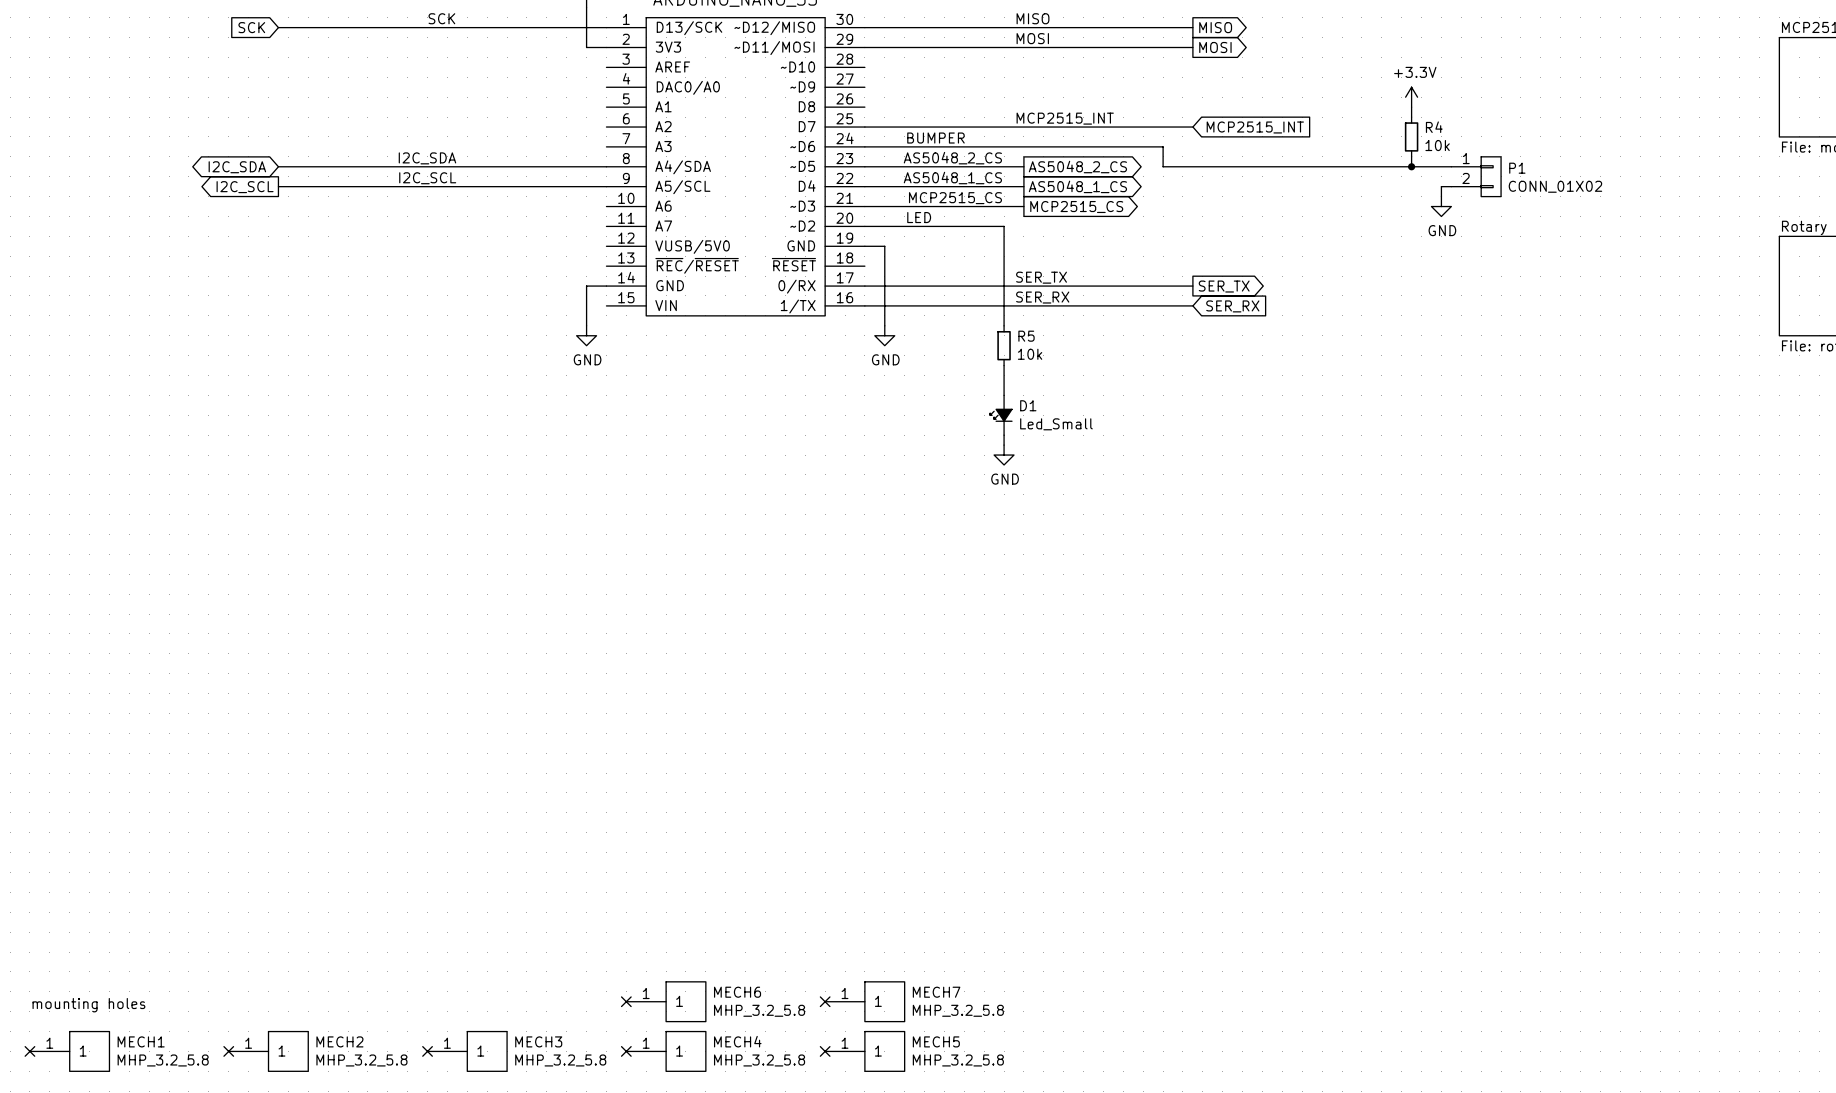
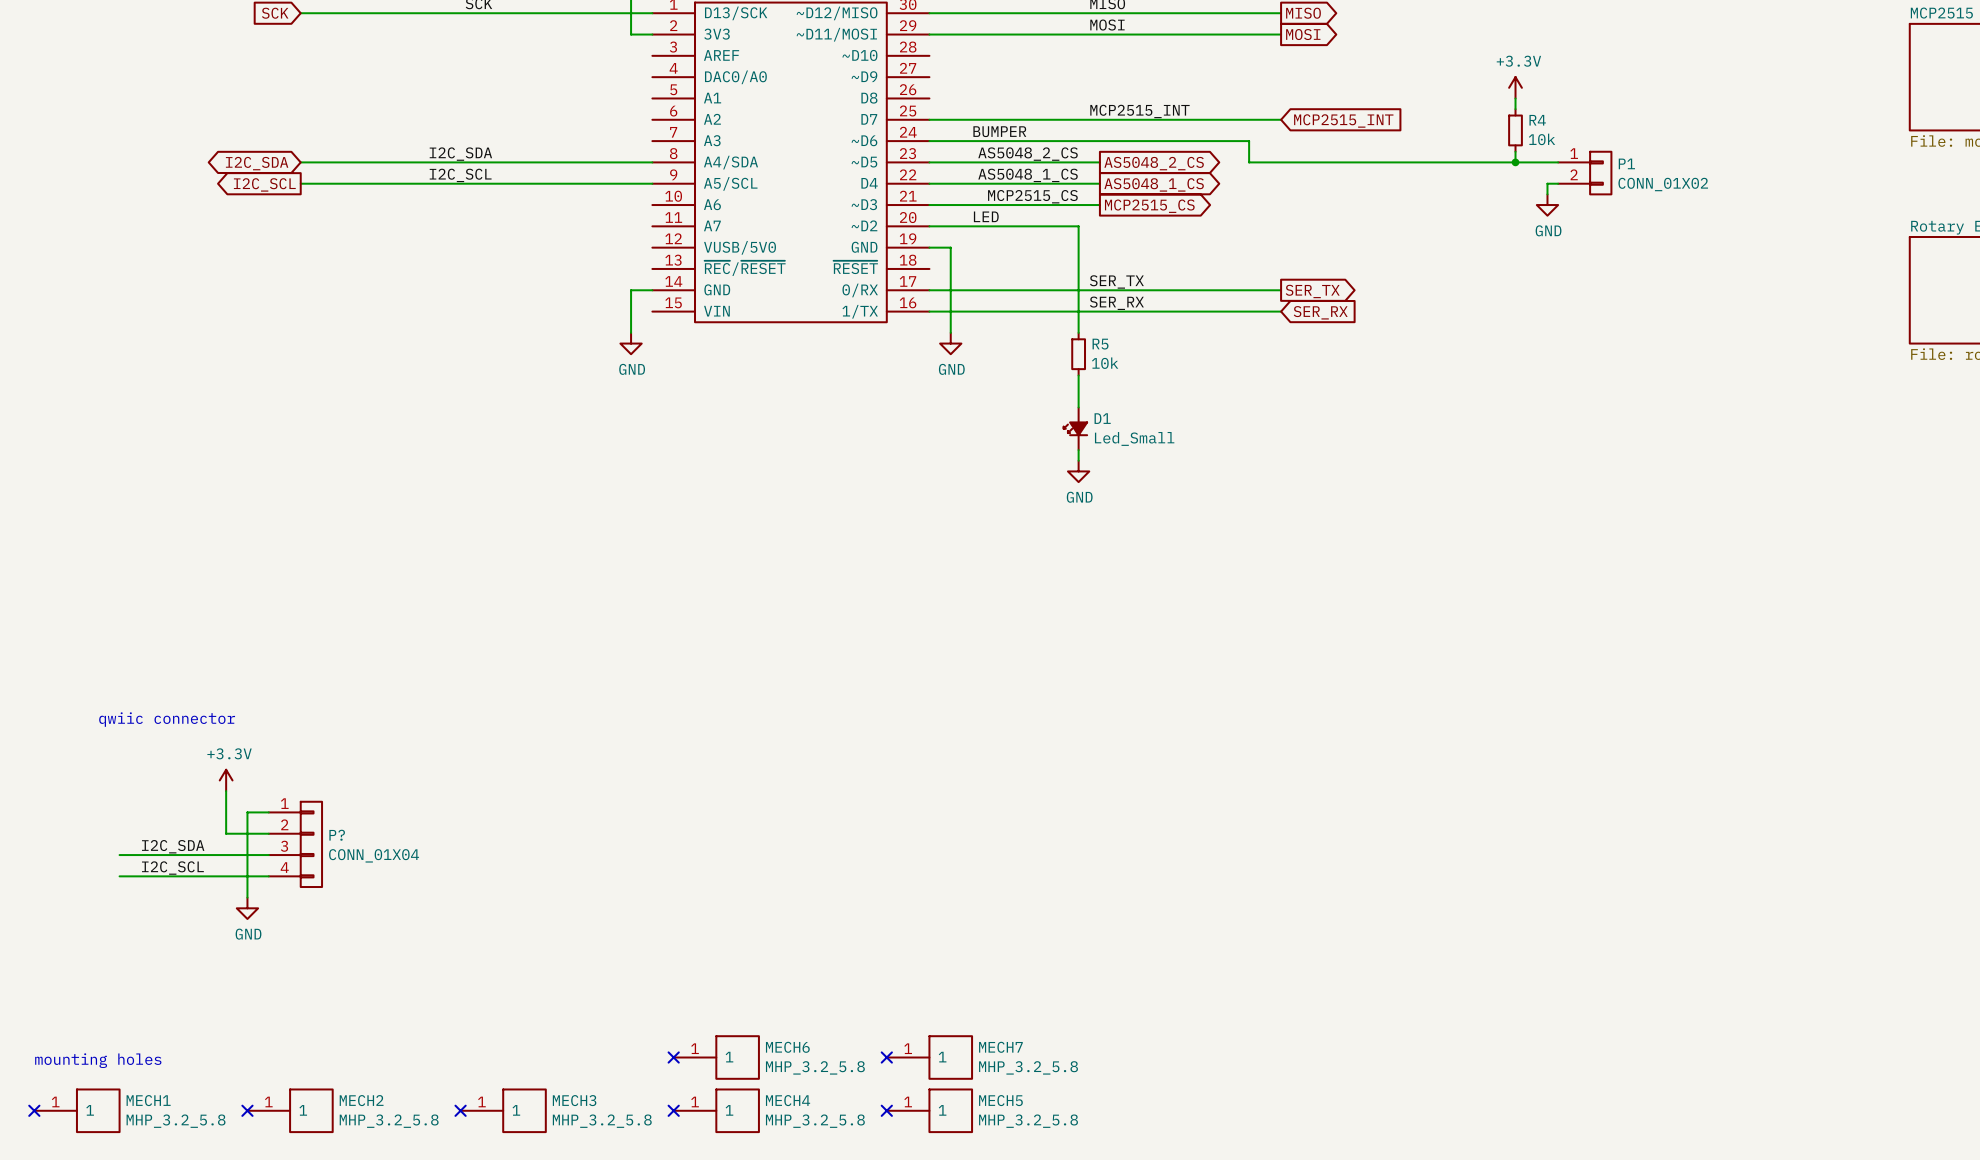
text: none -> qwiic connector (167, 719)
power symbol: none -> +3.3V (226, 780)
wire: none -> (226, 791) (226, 833) (268, 833)
wire: none -> (268, 812) (247, 812) (247, 897)
P?: none -> CONN_01X04 (295, 844)
label: none -> I2C_SDA (173, 846)
wire: none -> (119, 855) (268, 855)
label: none -> I2C_SCL (172, 868)
wire: none -> (119, 876) (268, 876)
power symbol: none -> GND (247, 908)

